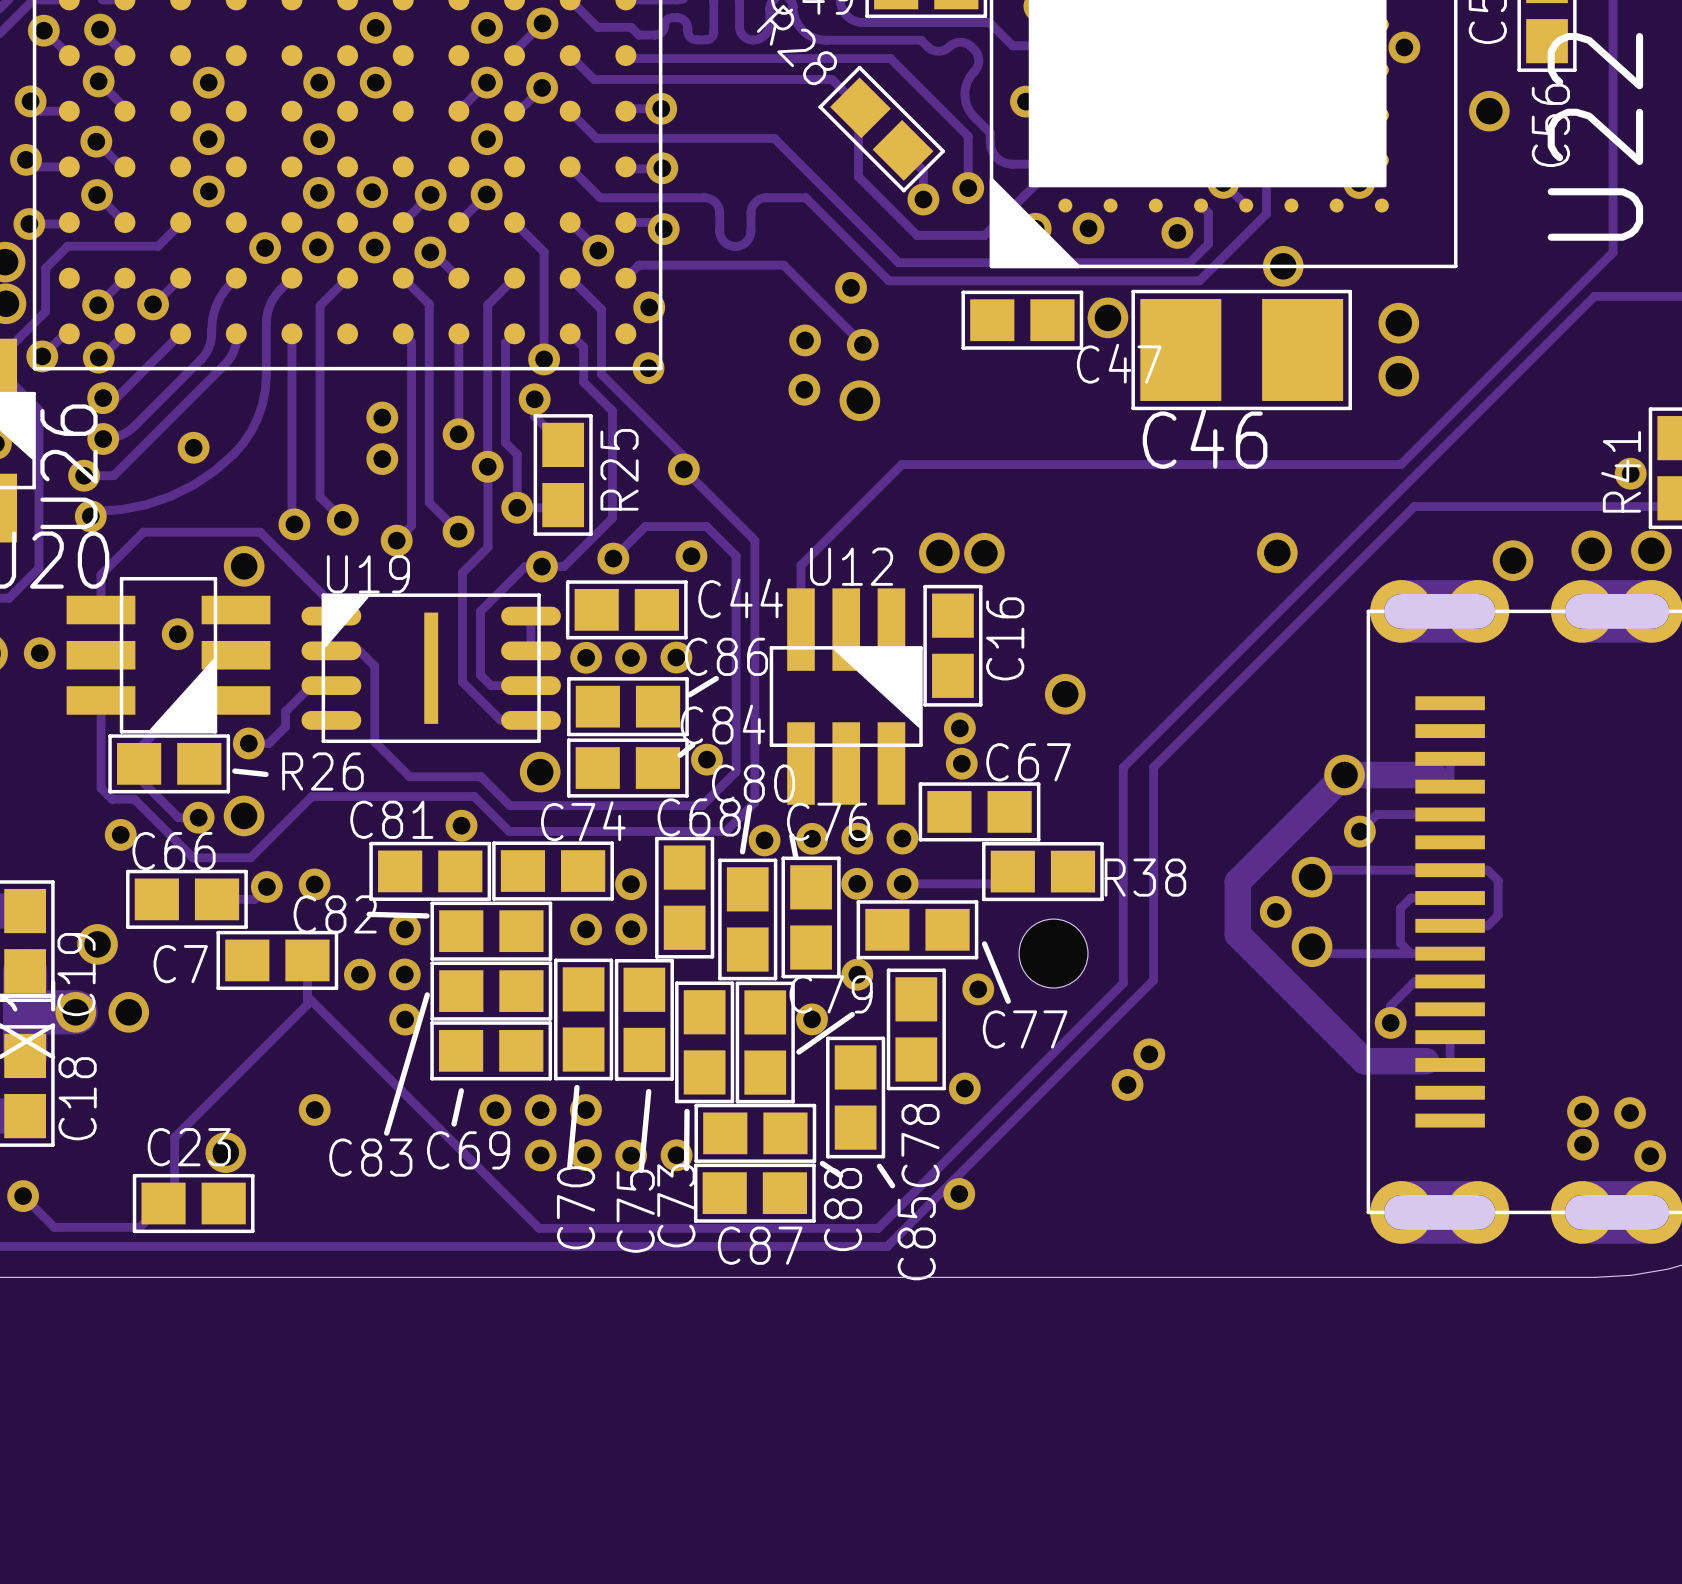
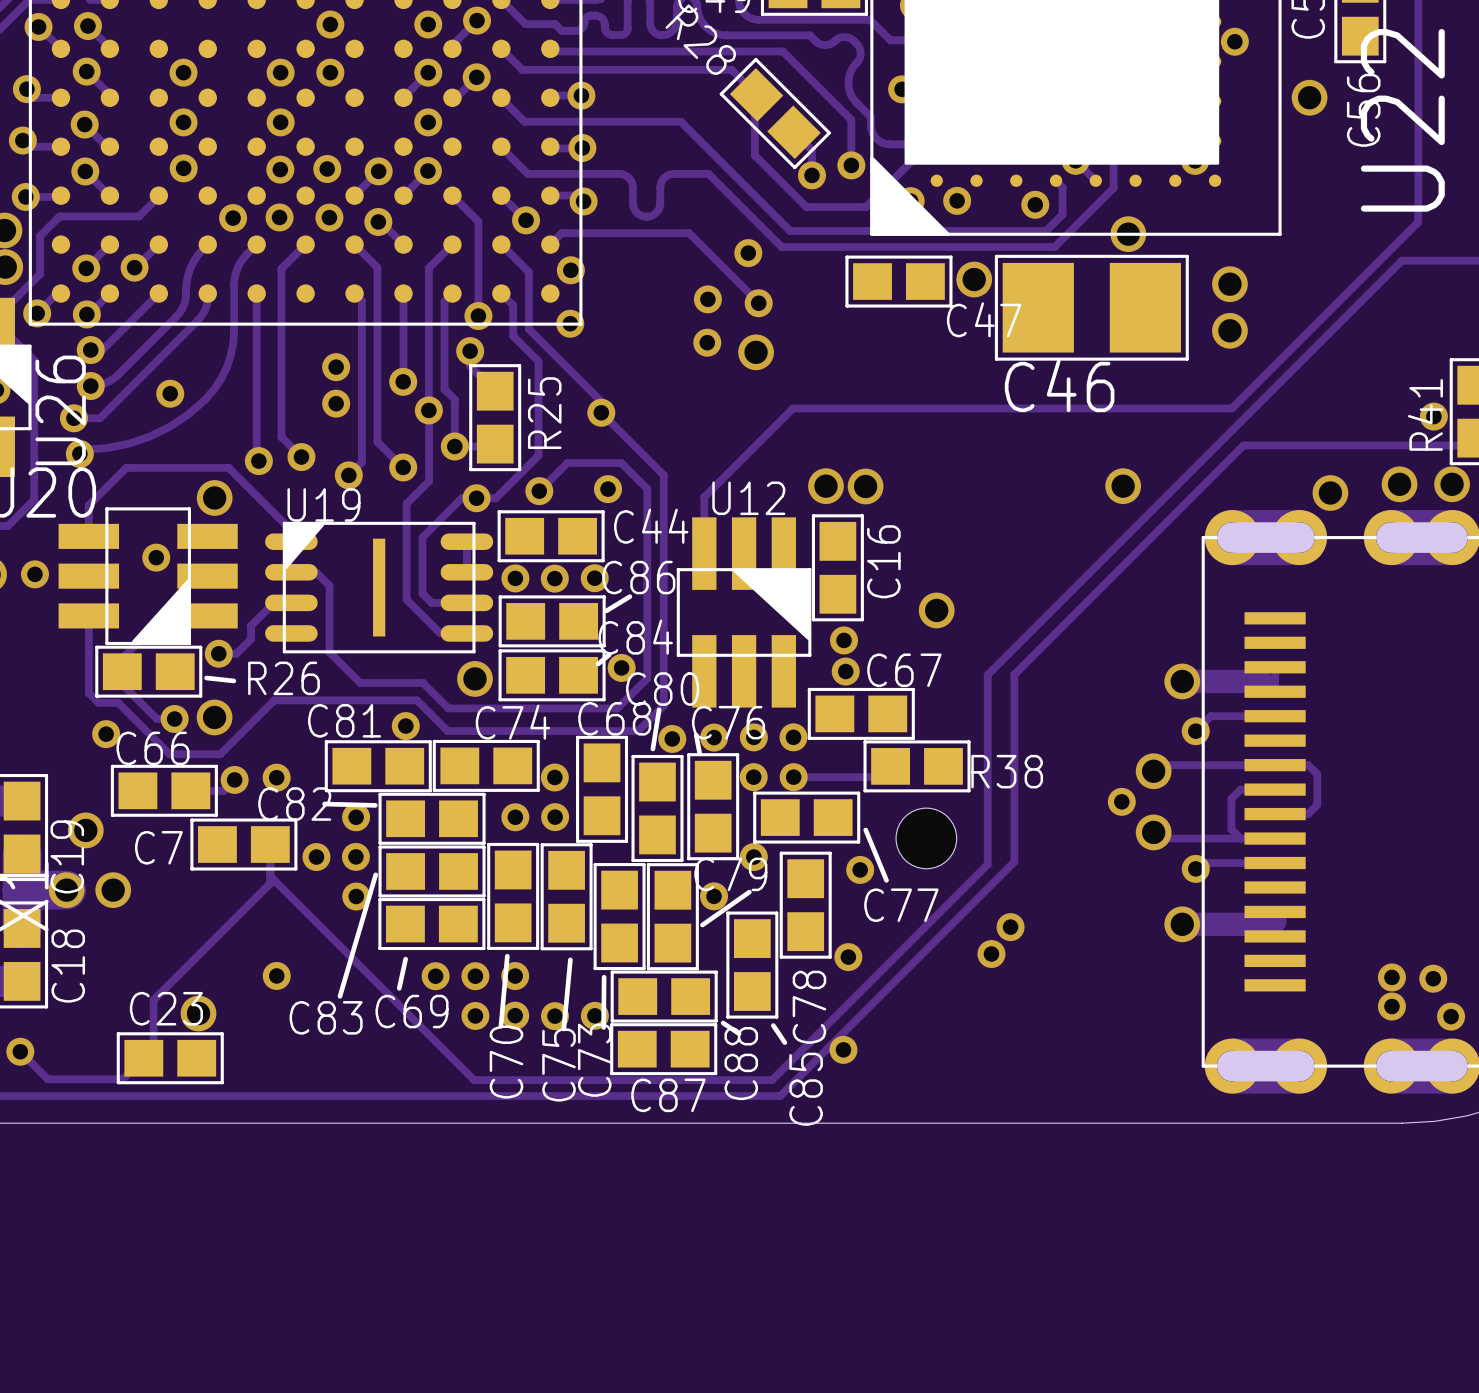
track: (1344, 775) (1237, 881) (1237, 934) (1364, 1061) (1426, 1061) -> none
track: (1414, 981) (1390, 1005) (1390, 1022) -> (1244, 863) (1201, 863) (1195, 868)
via position: (1390, 1022) -> (1195, 868)
track: none -> (1275, 921) (1271, 924) (1182, 924)
via: none -> (1182, 924)

